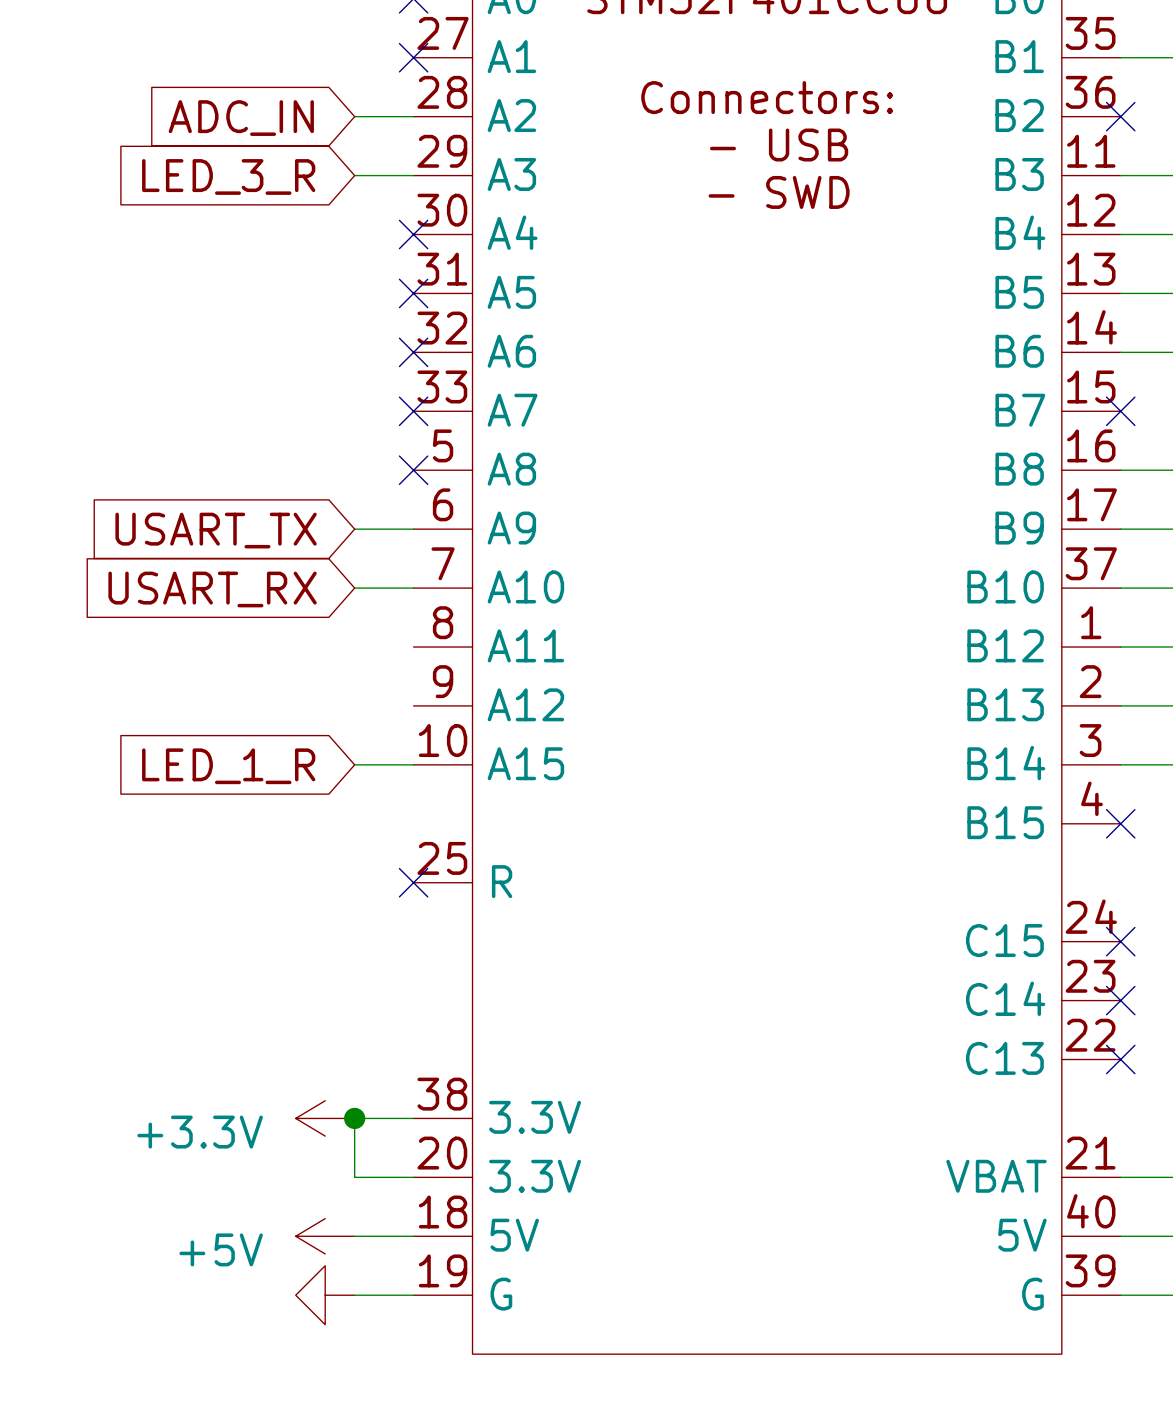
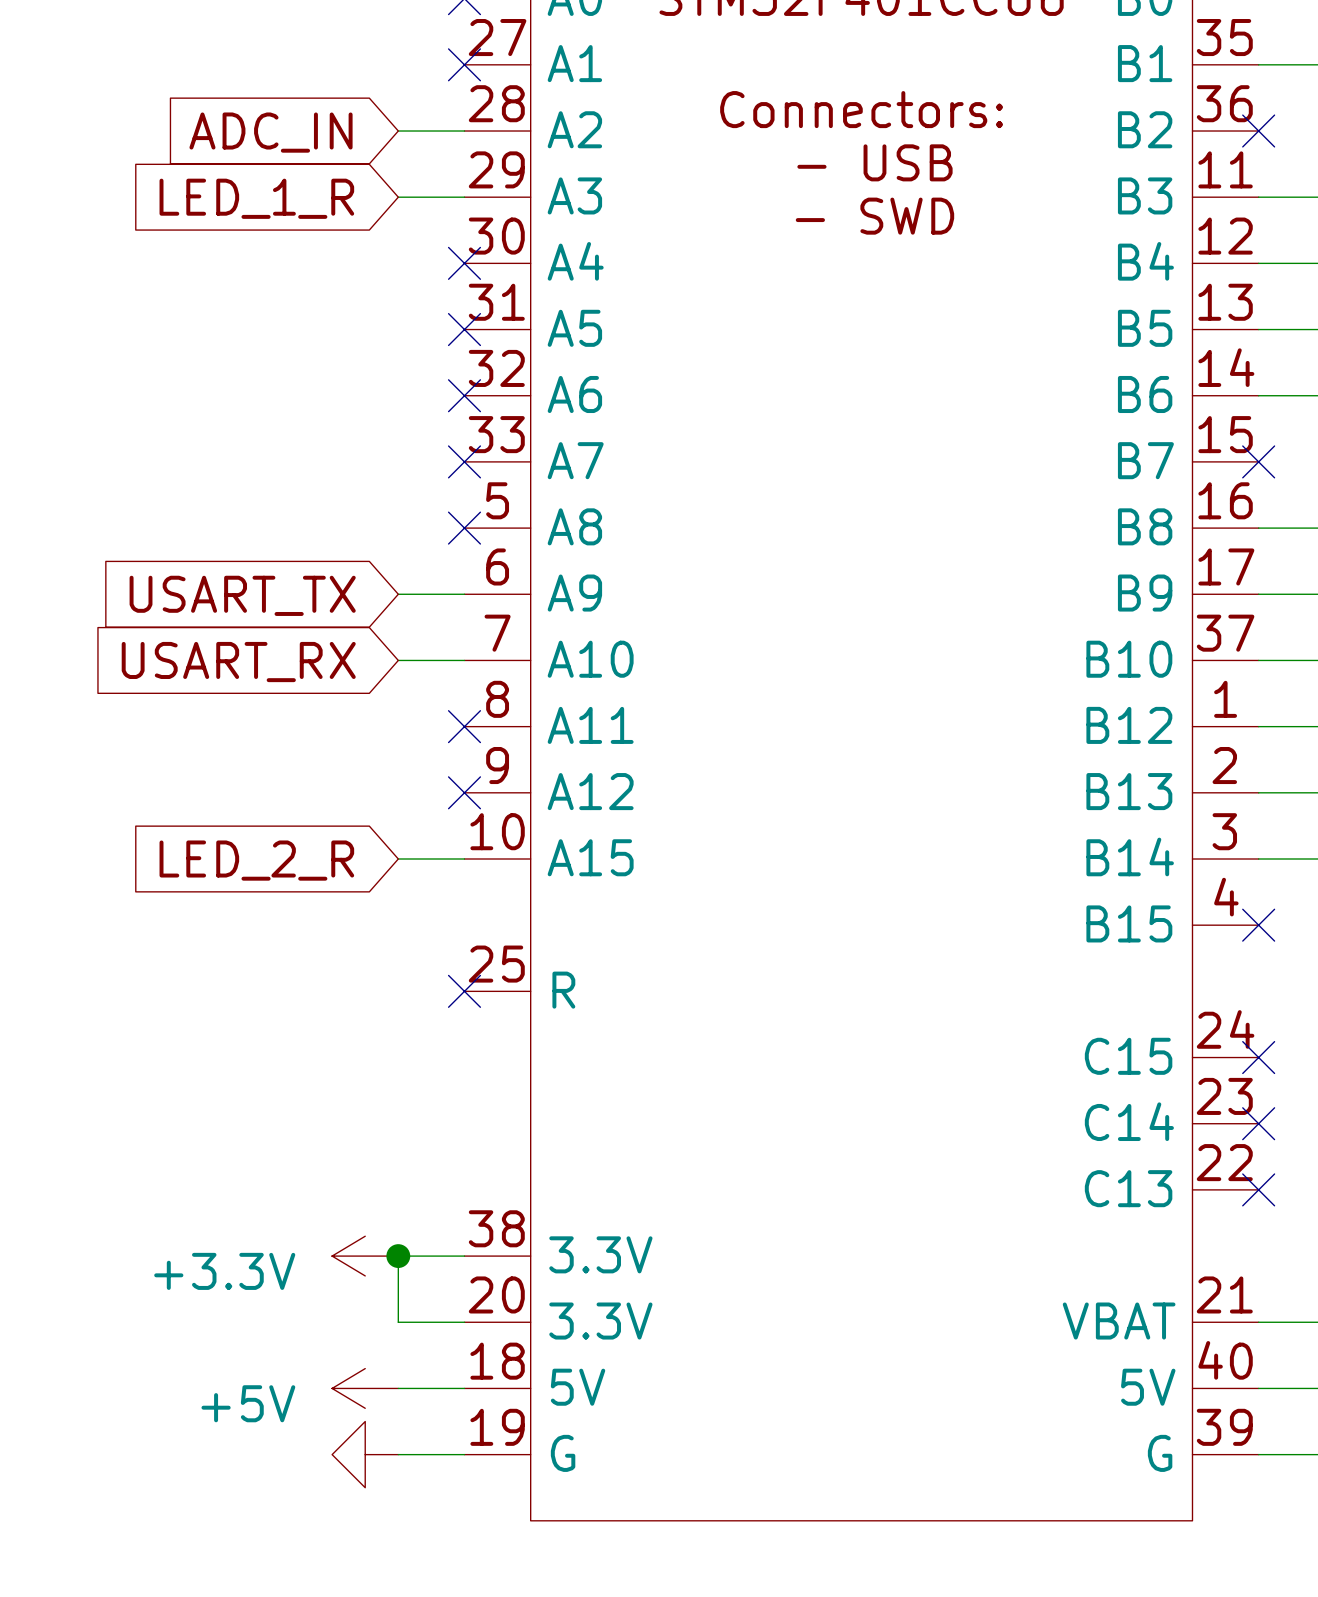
global label: LED_3_R (228, 176) -> LED_1_R (256, 198)
no-connect mark: none -> (464, 726)
no-connect mark: none -> (464, 792)
global label: LED_1_R (228, 766) -> LED_2_R (256, 860)

